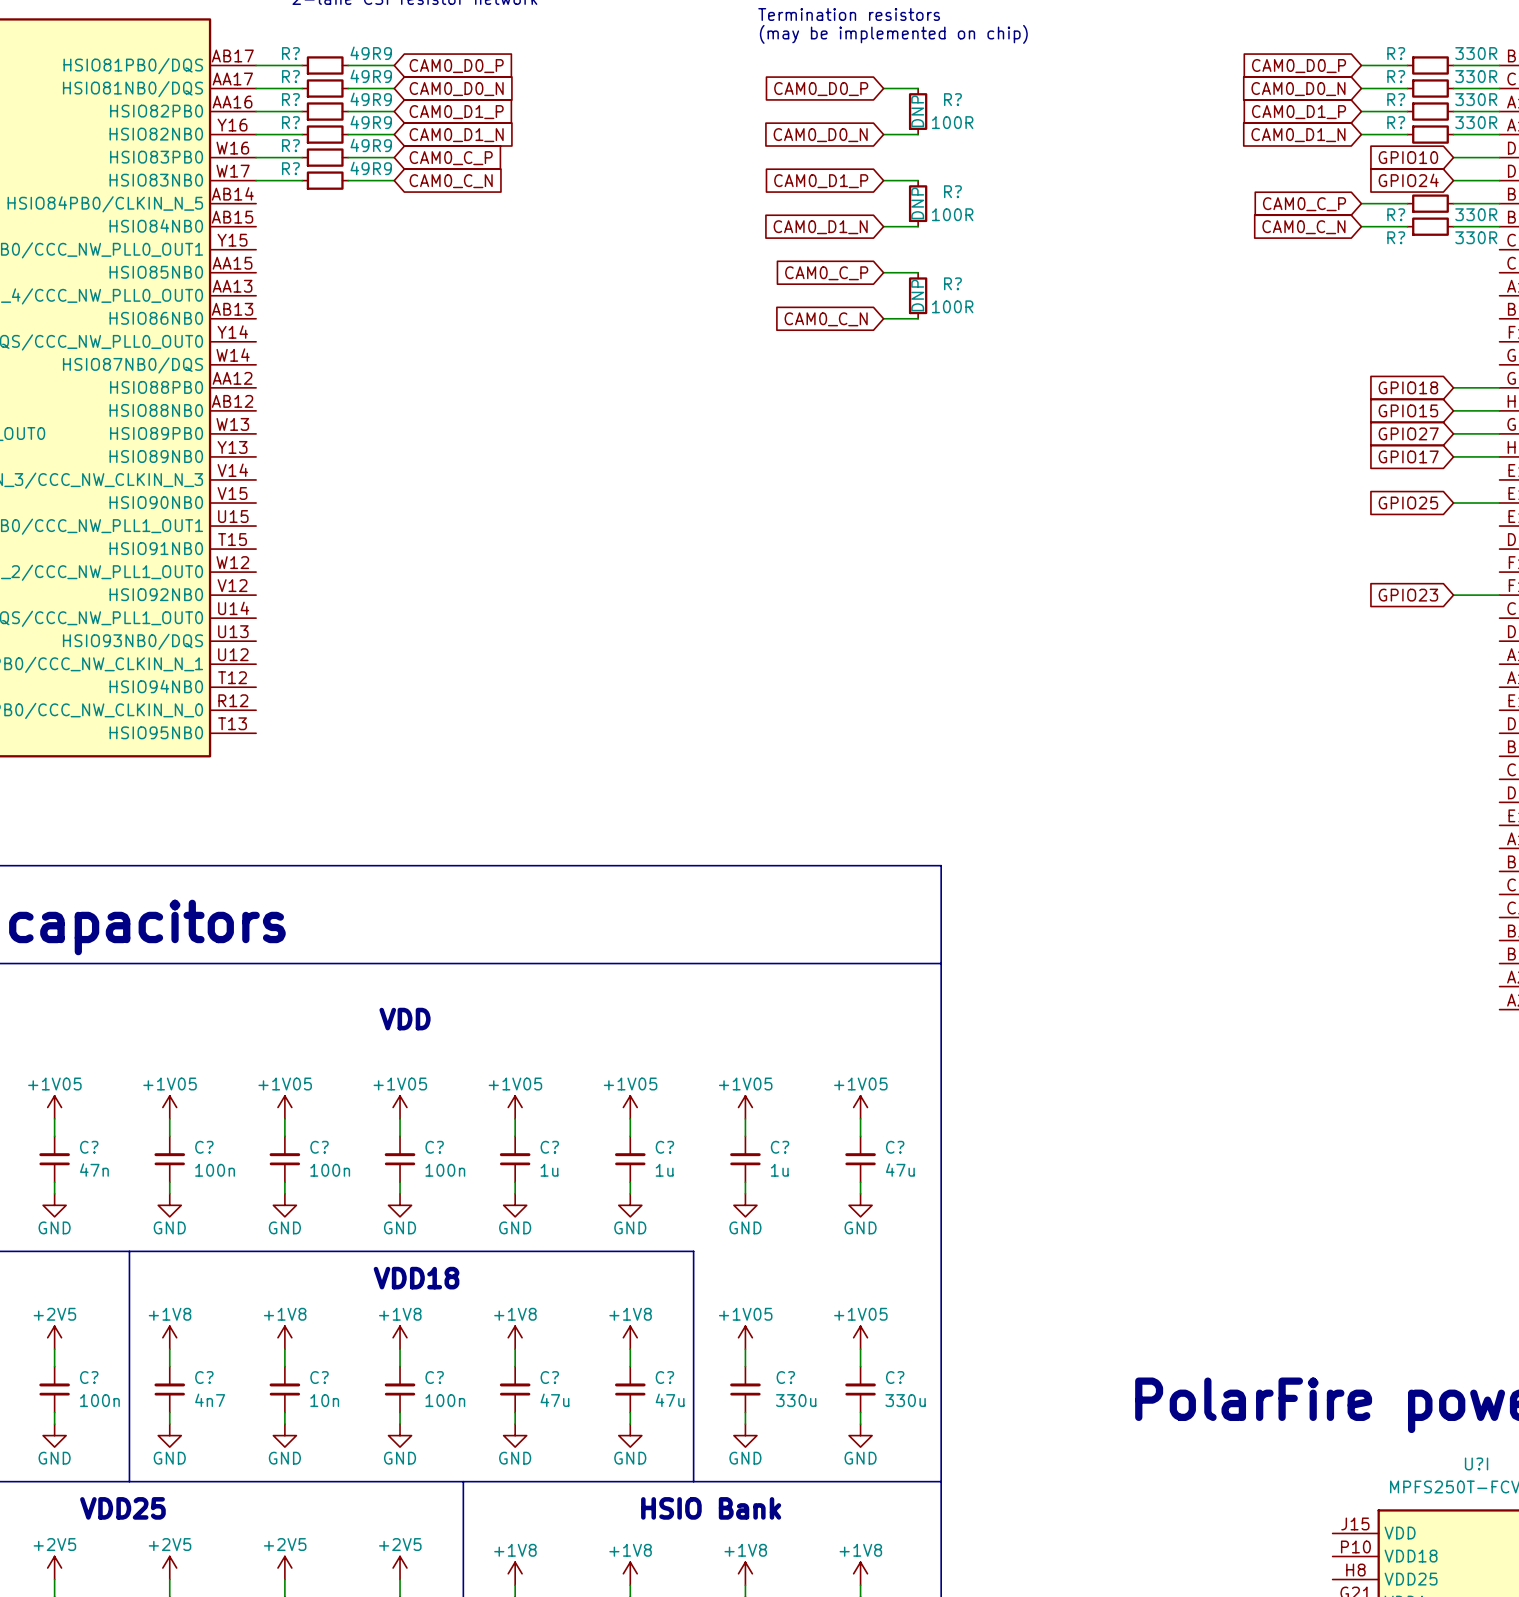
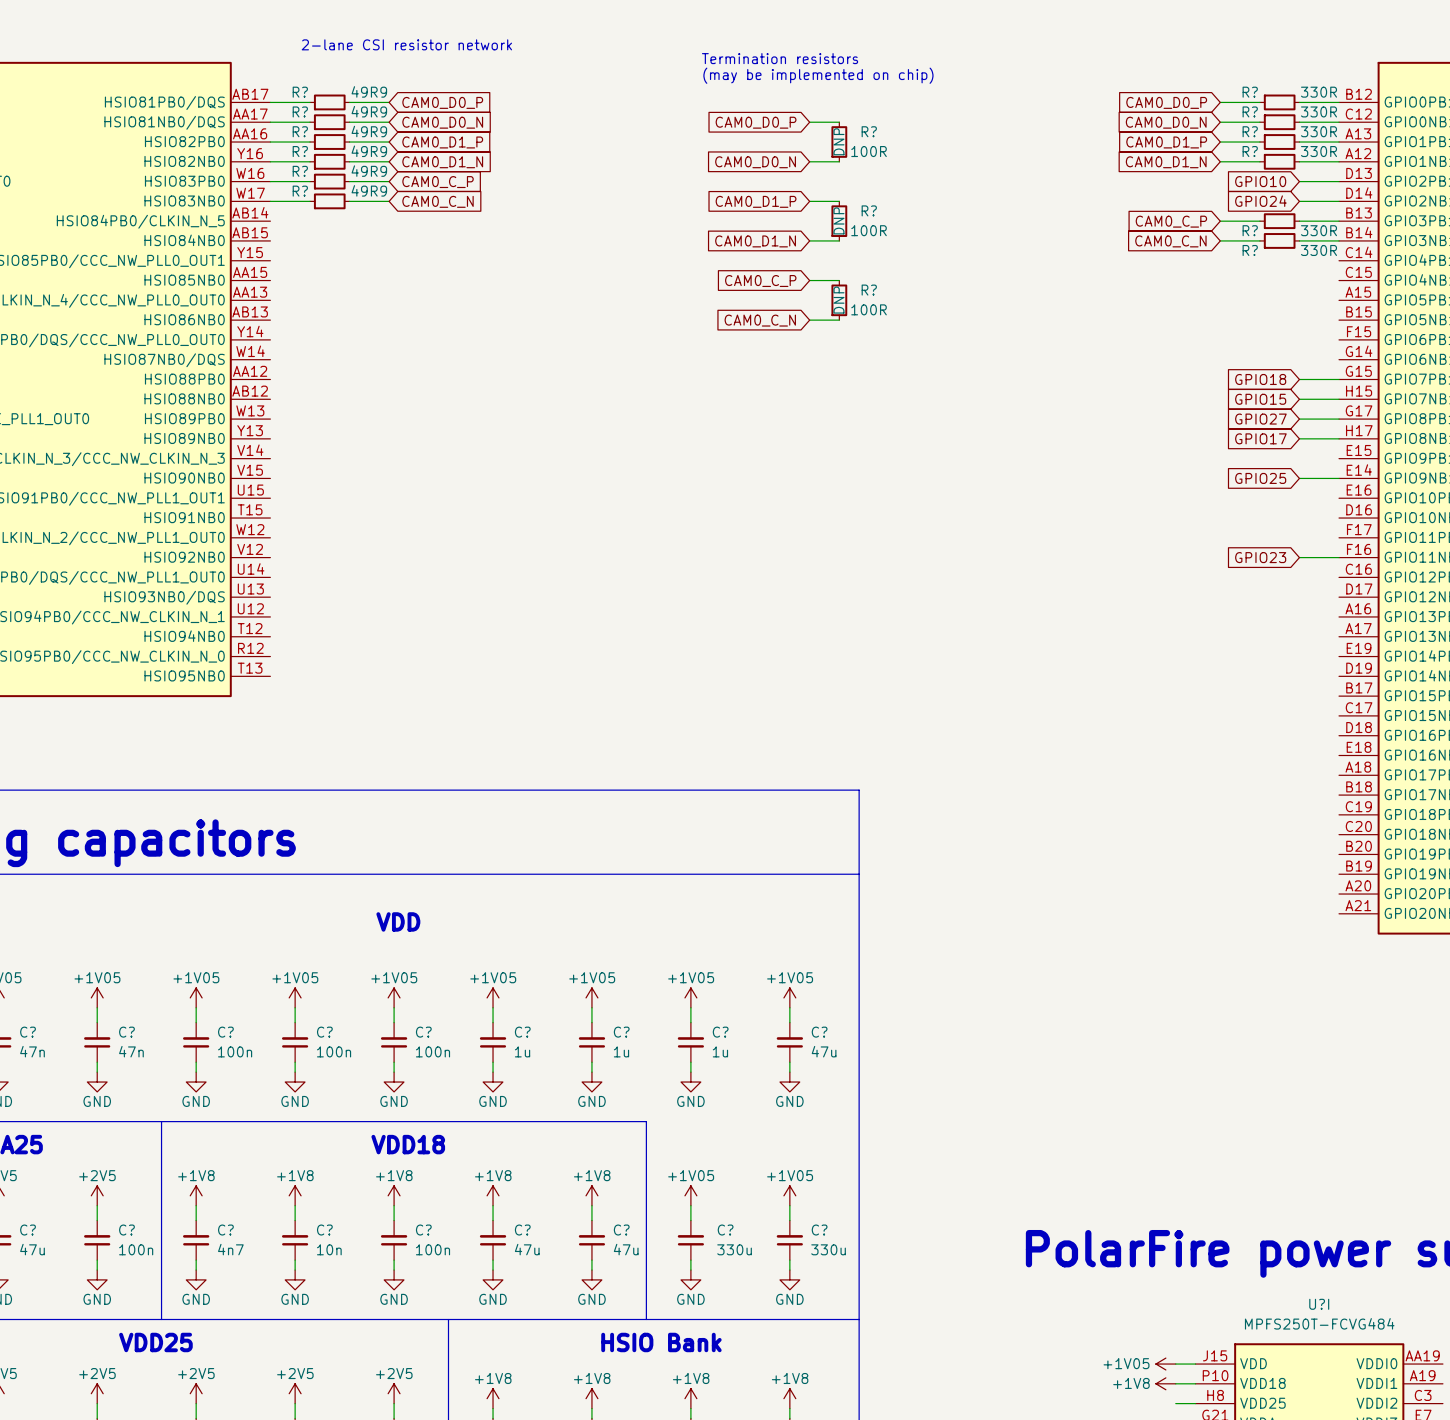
power symbol: none -> +1V05 (1165, 1364)
wire: none -> (1175, 1364) (1195, 1364)
power symbol: none -> +1V8 (1165, 1383)
wire: none -> (1175, 1383) (1195, 1383)
wire: none -> (1175, 1403) (1195, 1403)

